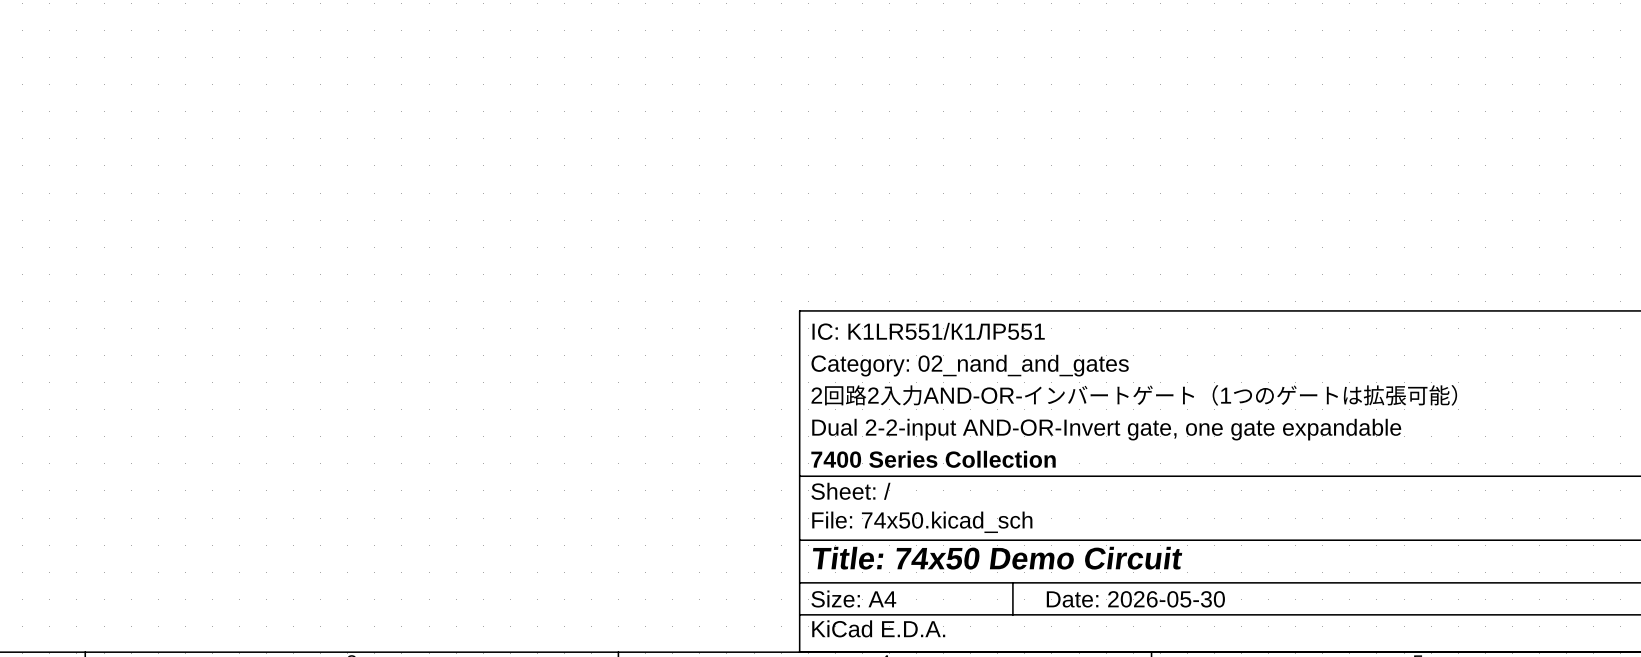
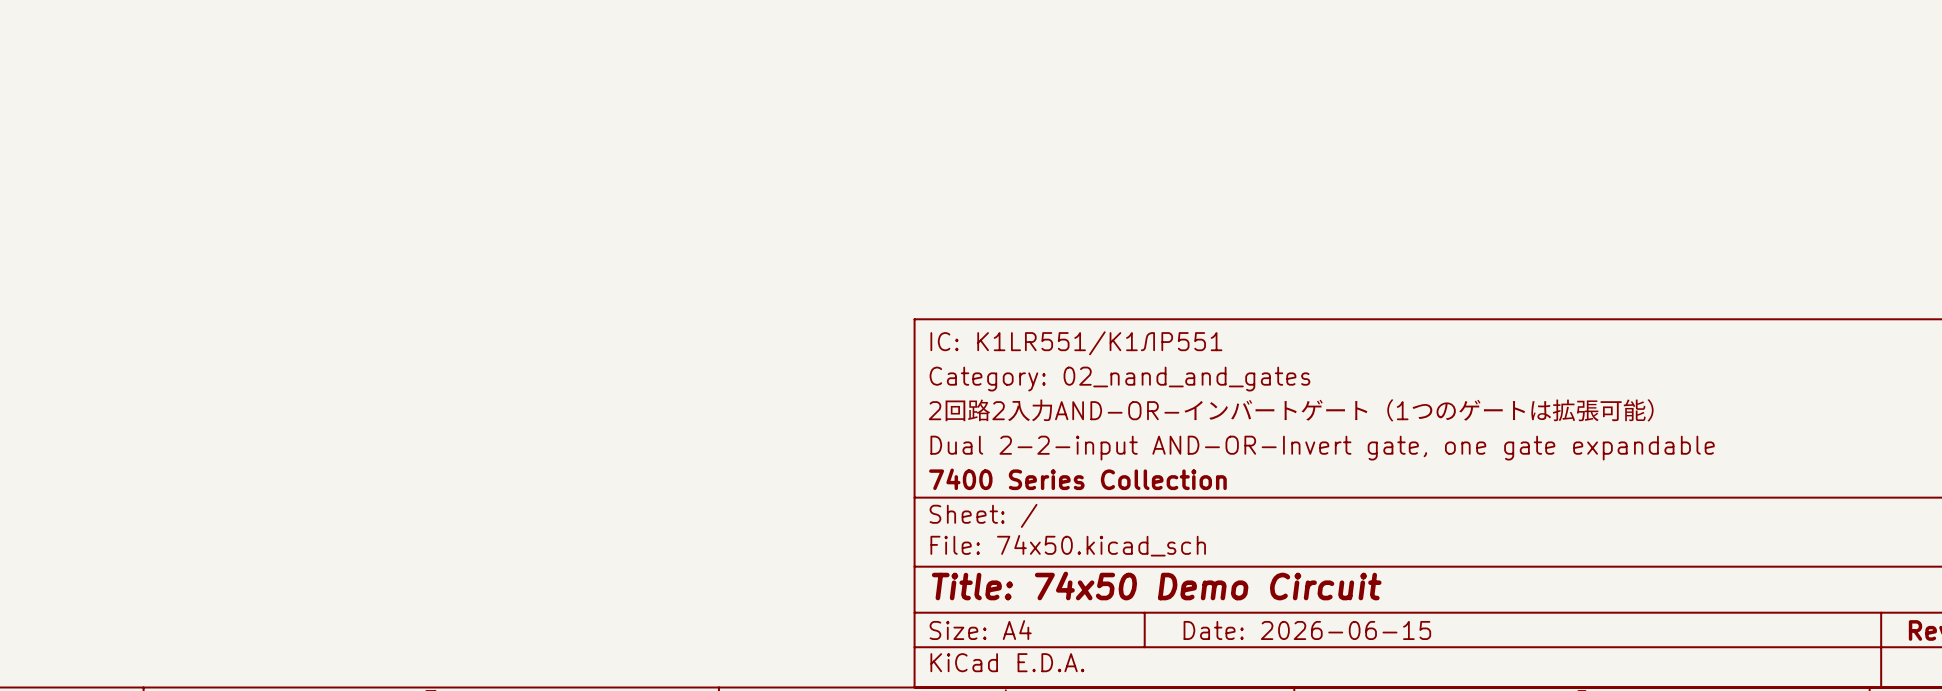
title block: Date: 2026-05-30 (1135, 599) -> Date: 2026-06-15 (1307, 630)

